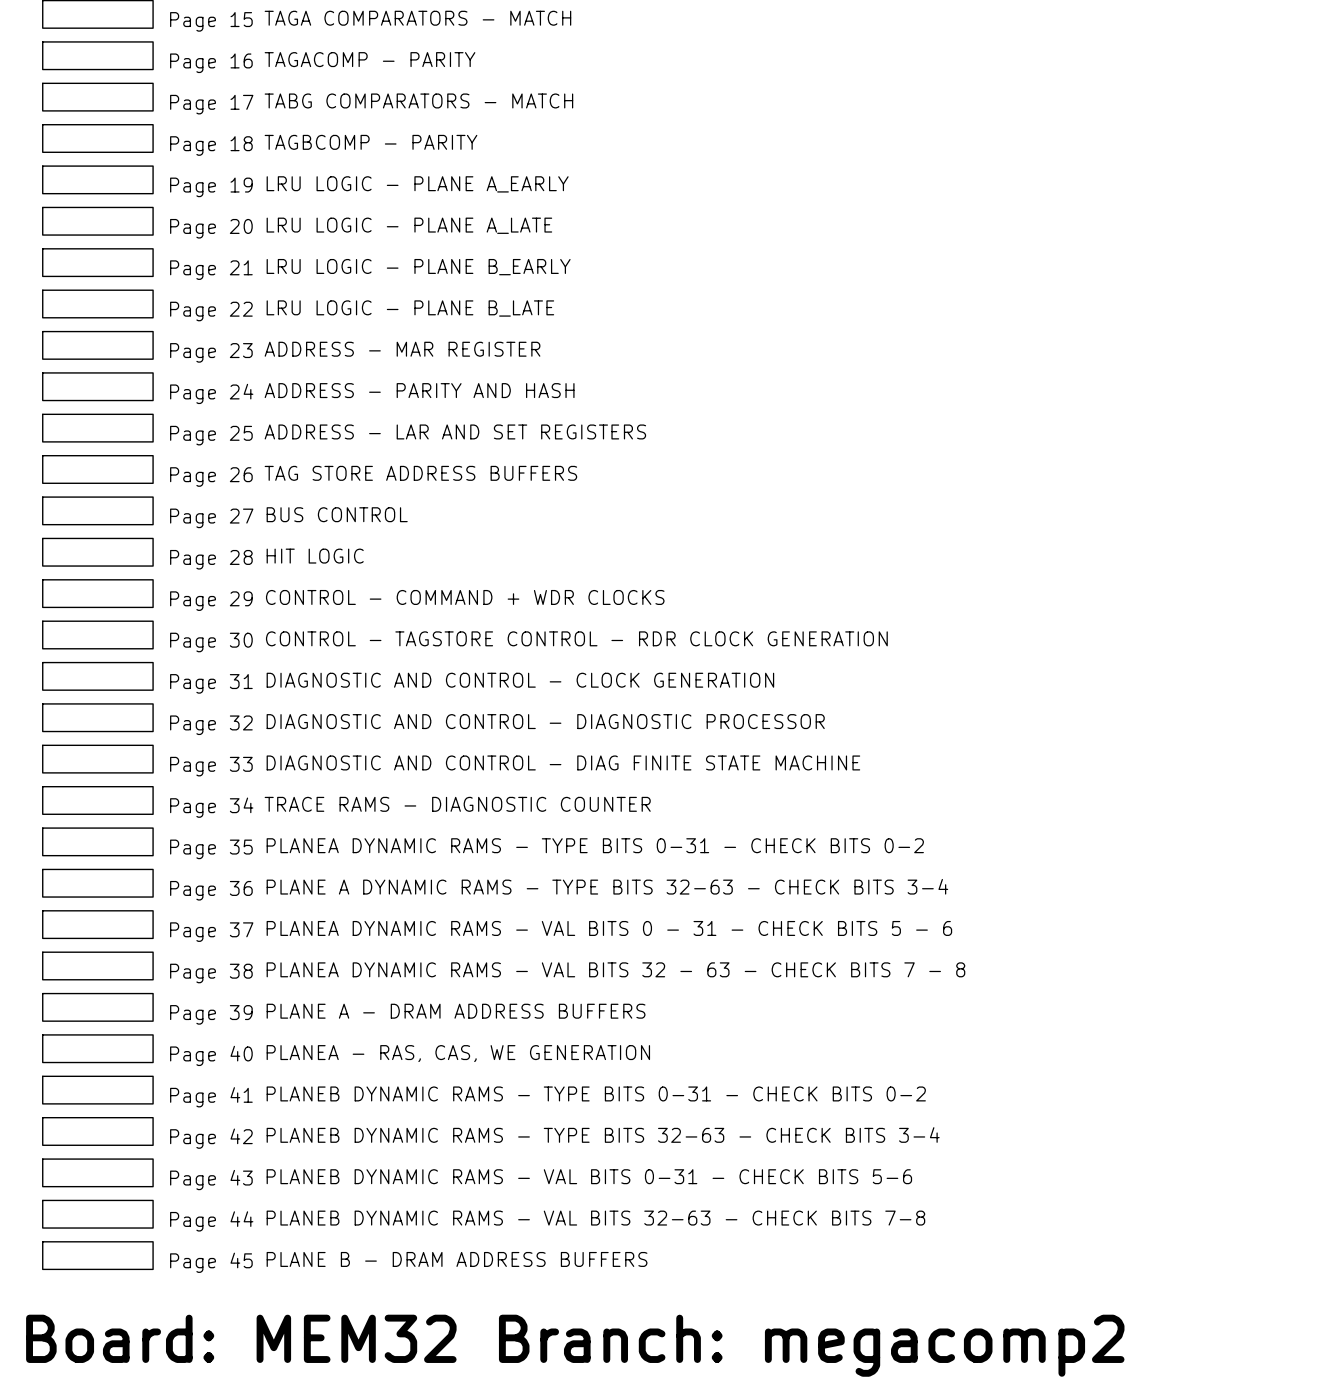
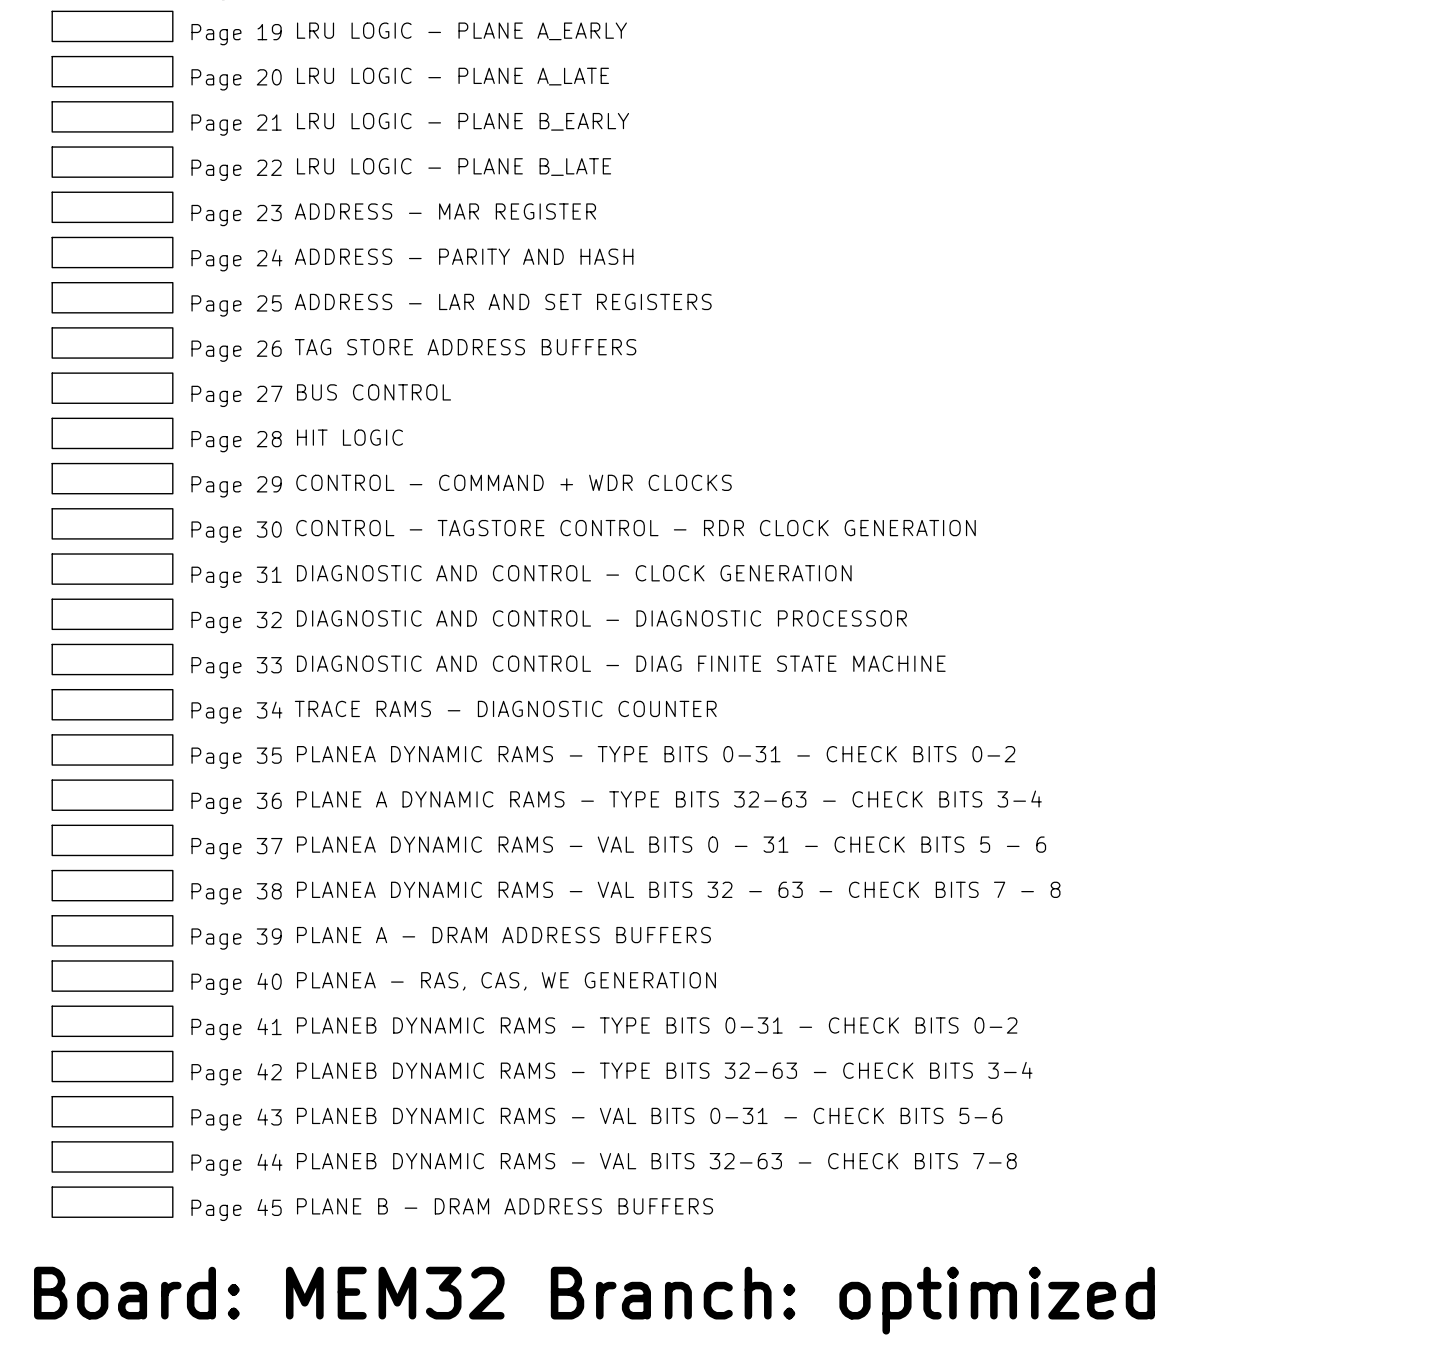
text: Board: MEM32 Branch: megacomp2 (575, 1345) -> Board: MEM32 Branch: optimized (594, 1300)

